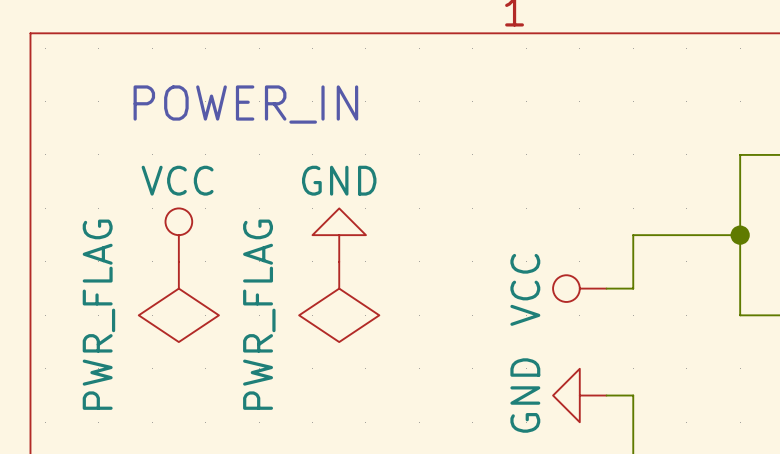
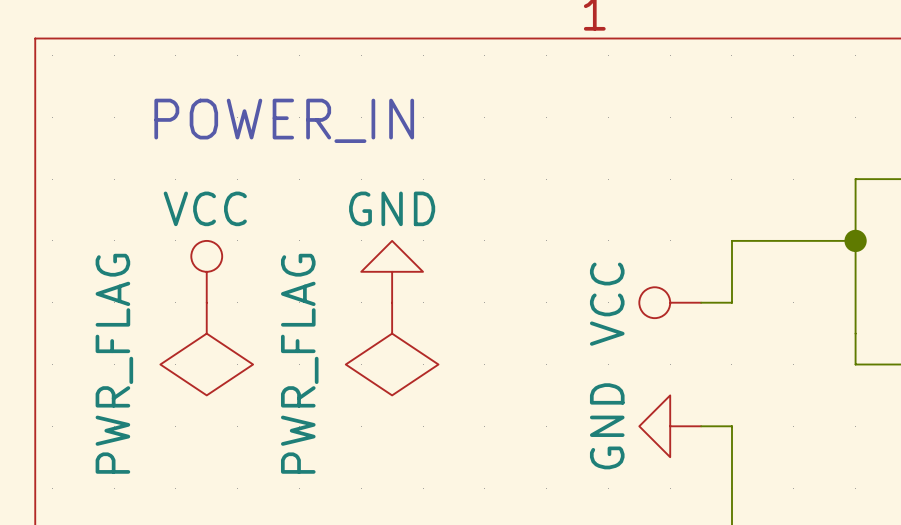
wire: (633, 235) (740, 235) -> (731, 271) (731, 240) (855, 240)
junction position: (740, 235) -> (855, 240)
wire: (633, 261) (633, 288) (606, 288) -> (731, 302) (701, 302)
power symbol position: VCC (579, 288) -> VCC (670, 302)
power symbol position: GND (579, 395) -> GND (670, 426)
wire: (606, 395) (633, 395) -> (701, 426) (731, 426) (731, 457)

